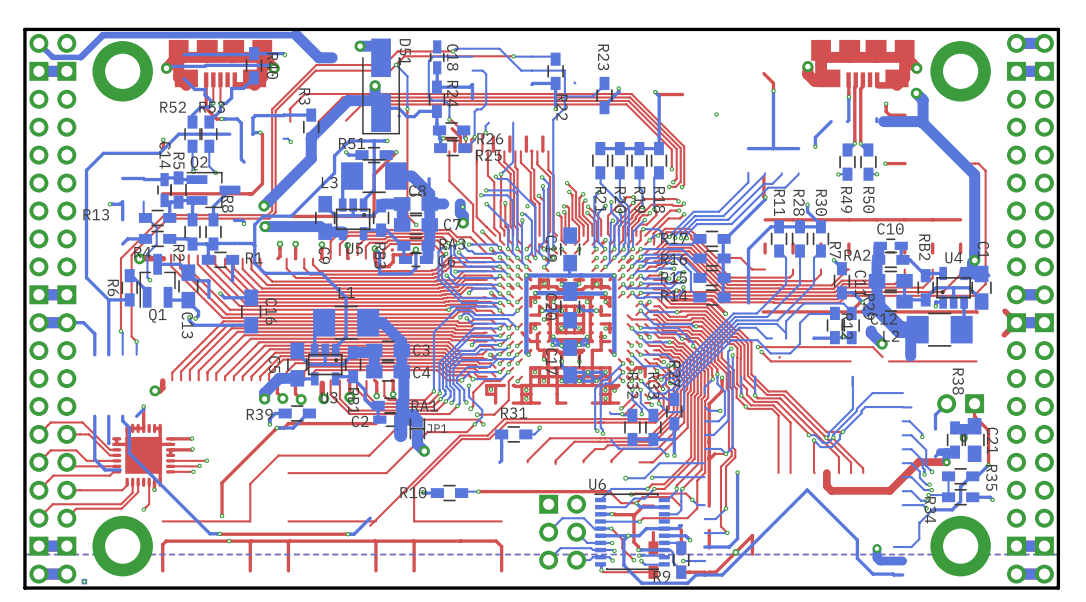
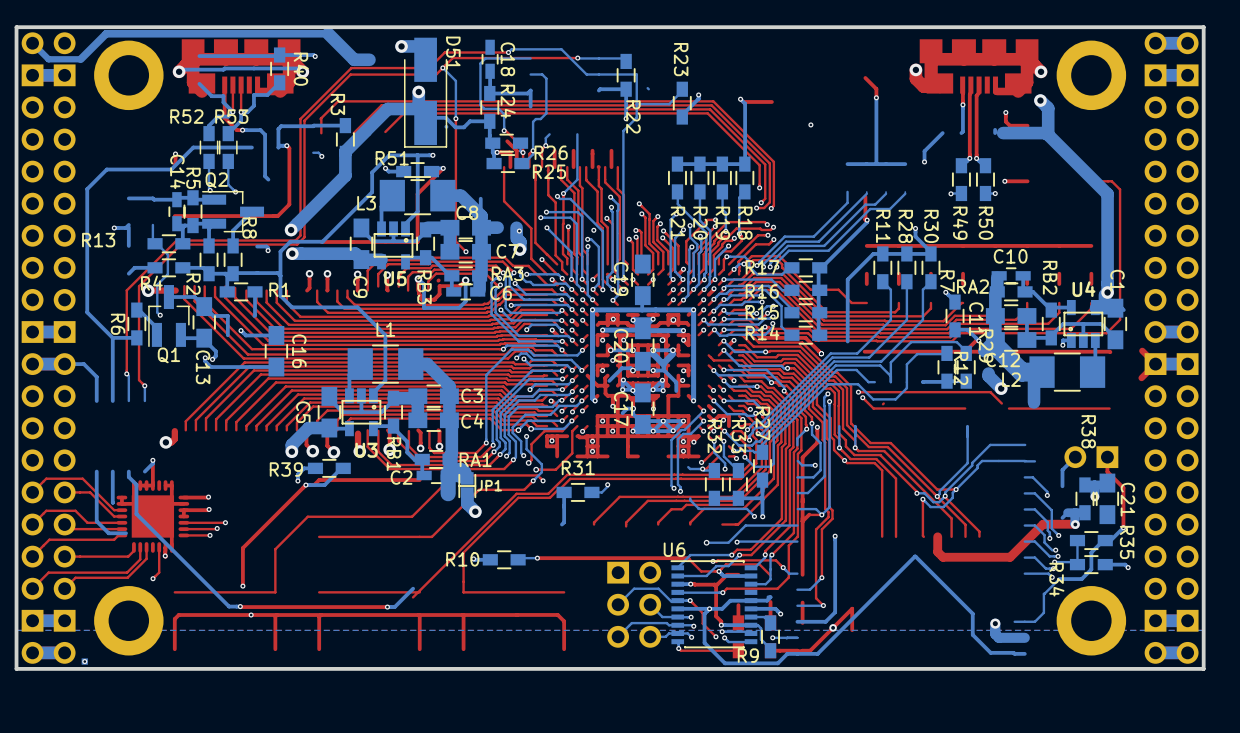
bottom track: (583, 310) (579, 306) (579, 310) -> (658, 350) (653, 350) (653, 354) (663, 364)
bottom track: none -> (672, 350) (672, 353) (663, 363) (663, 368)
bottom track: none -> (632, 370) (630, 368) (621, 368) (609, 380)
bottom track: none -> (653, 370) (664, 370) (676, 382) (676, 391)
bottom track: none -> (633, 408) (627, 408) (622, 413)

